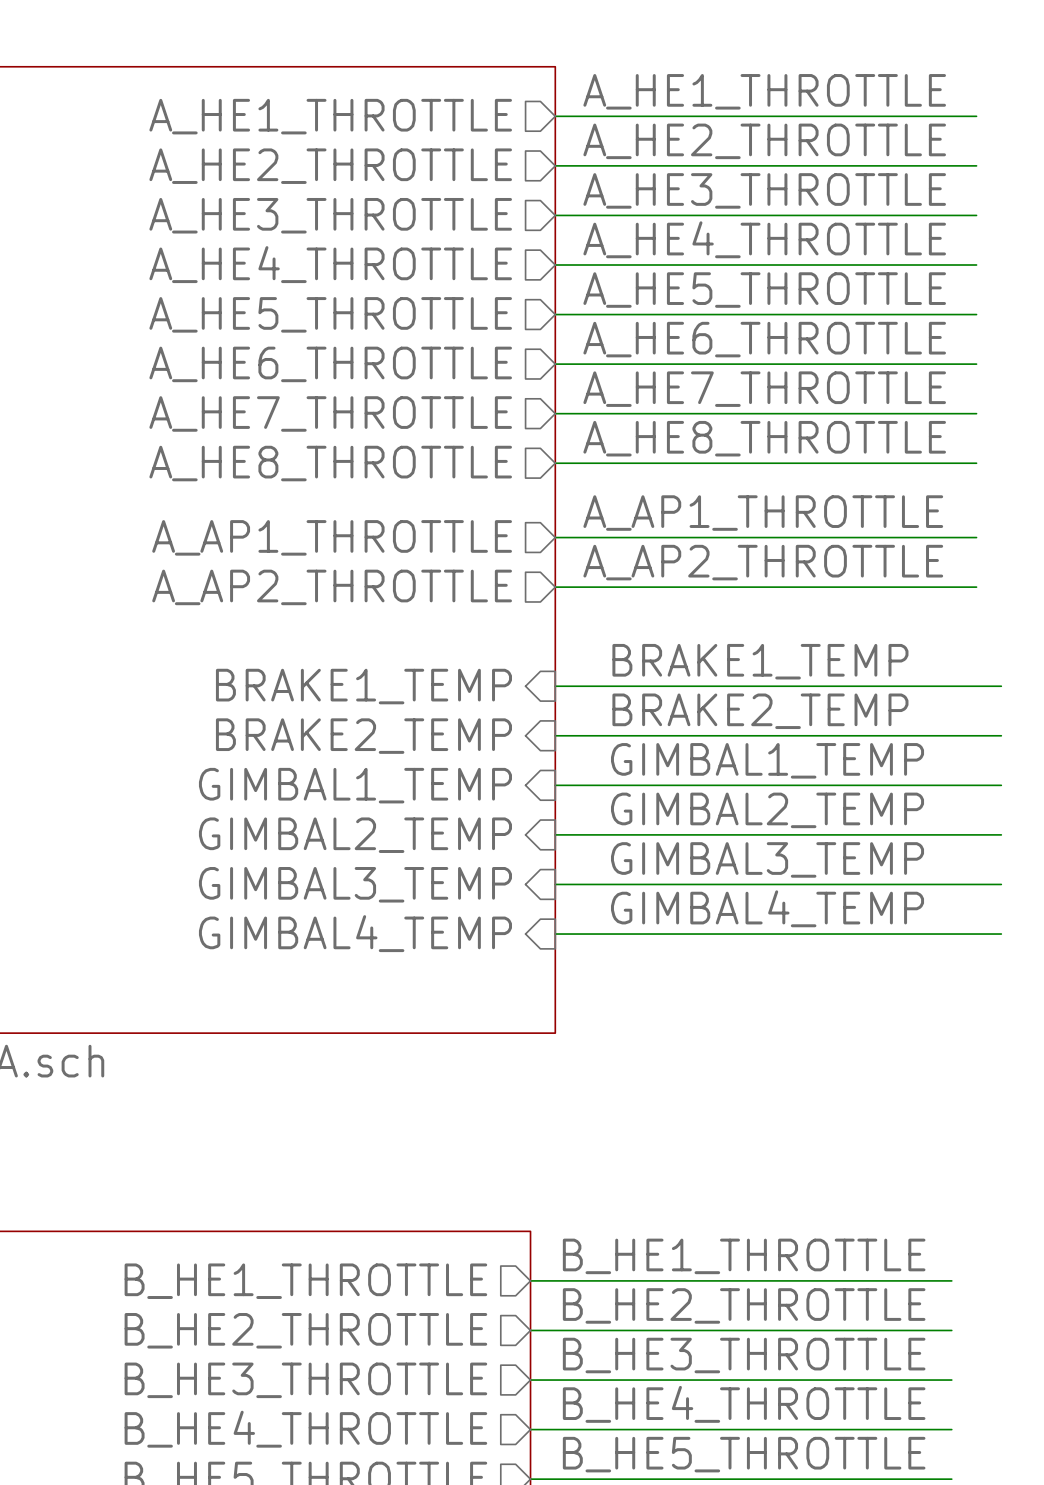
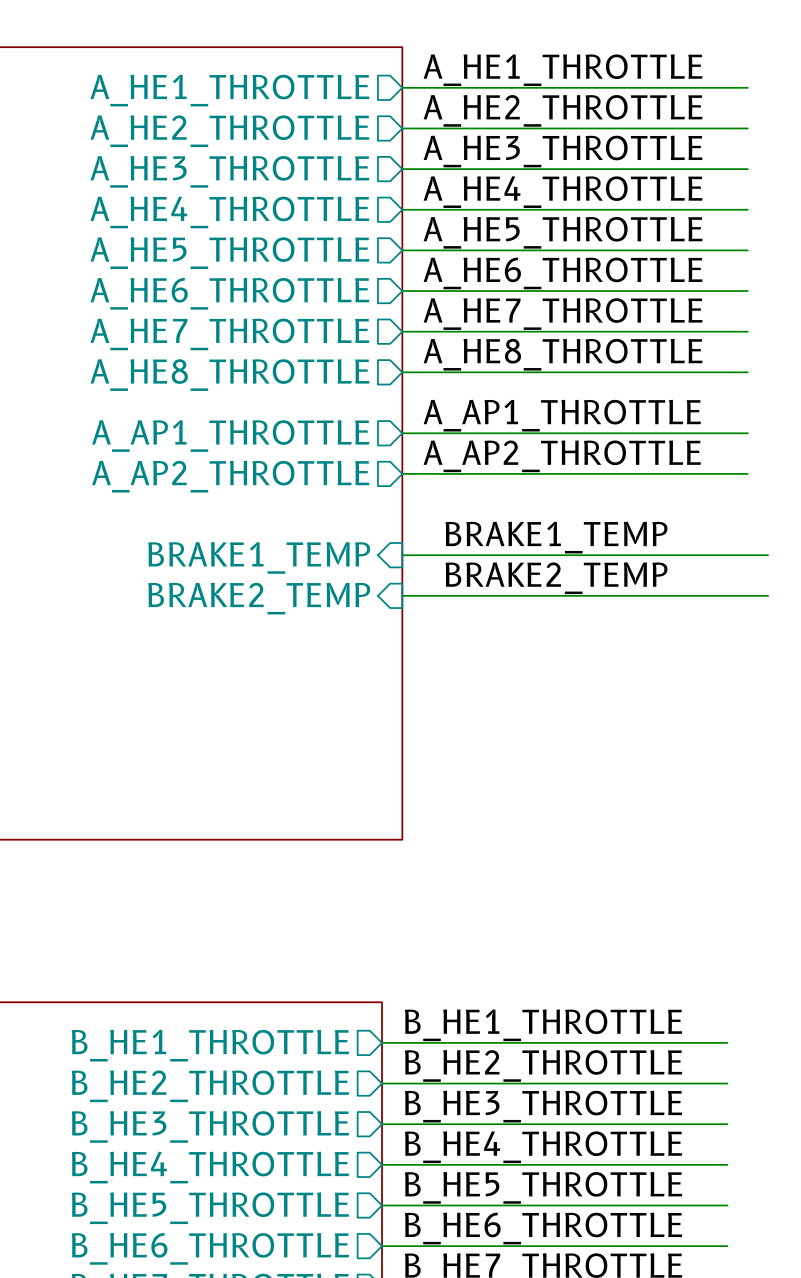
label: GIMBAL1_TEMP (767, 760) -> none
sheet pin: GIMBAL1_TEMP (355, 785) -> none
wire: (555, 785) (1001, 785) -> none
label: GIMBAL2_TEMP (767, 810) -> none
wire: (555, 834) (1001, 834) -> none
sheet pin: GIMBAL2_TEMP (355, 835) -> none
label: GIMBAL3_TEMP (767, 859) -> none
sheet pin: GIMBAL3_TEMP (355, 884) -> none
wire: (555, 884) (1001, 884) -> none
label: GIMBAL4_TEMP (767, 908) -> none
sheet pin: GIMBAL4_TEMP (355, 933) -> none
wire: (555, 934) (1001, 934) -> none

